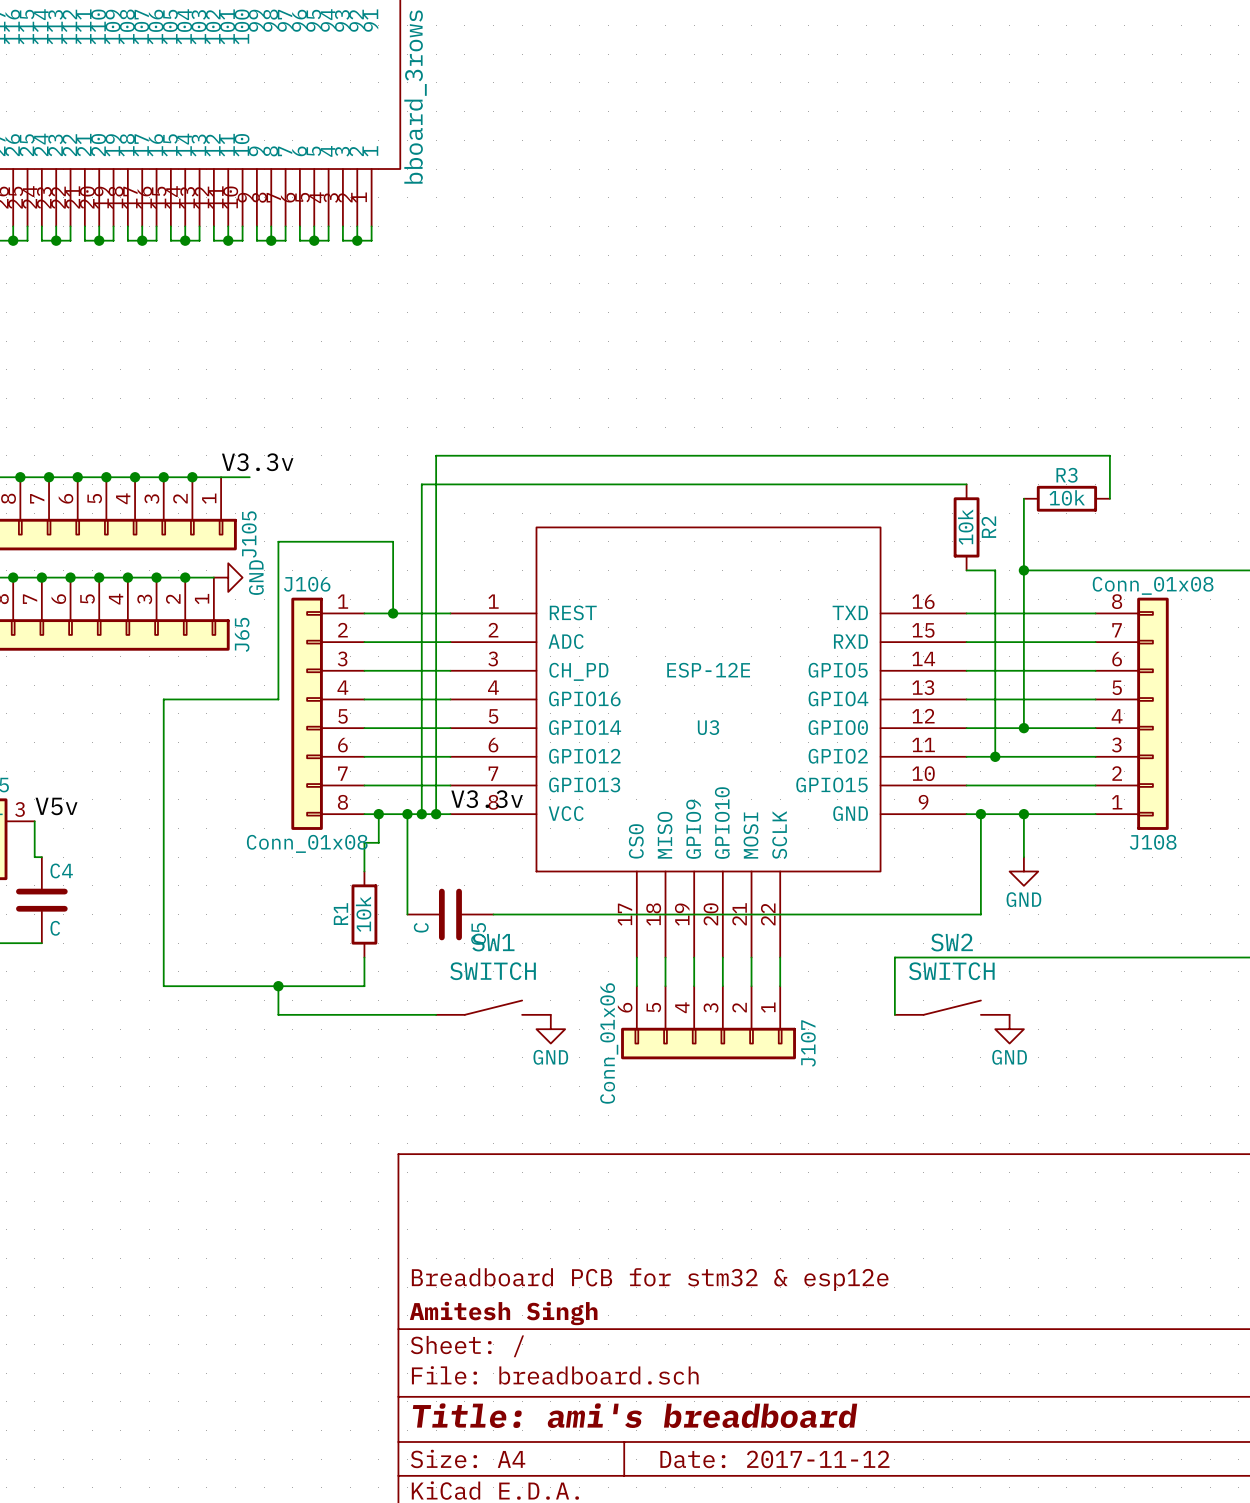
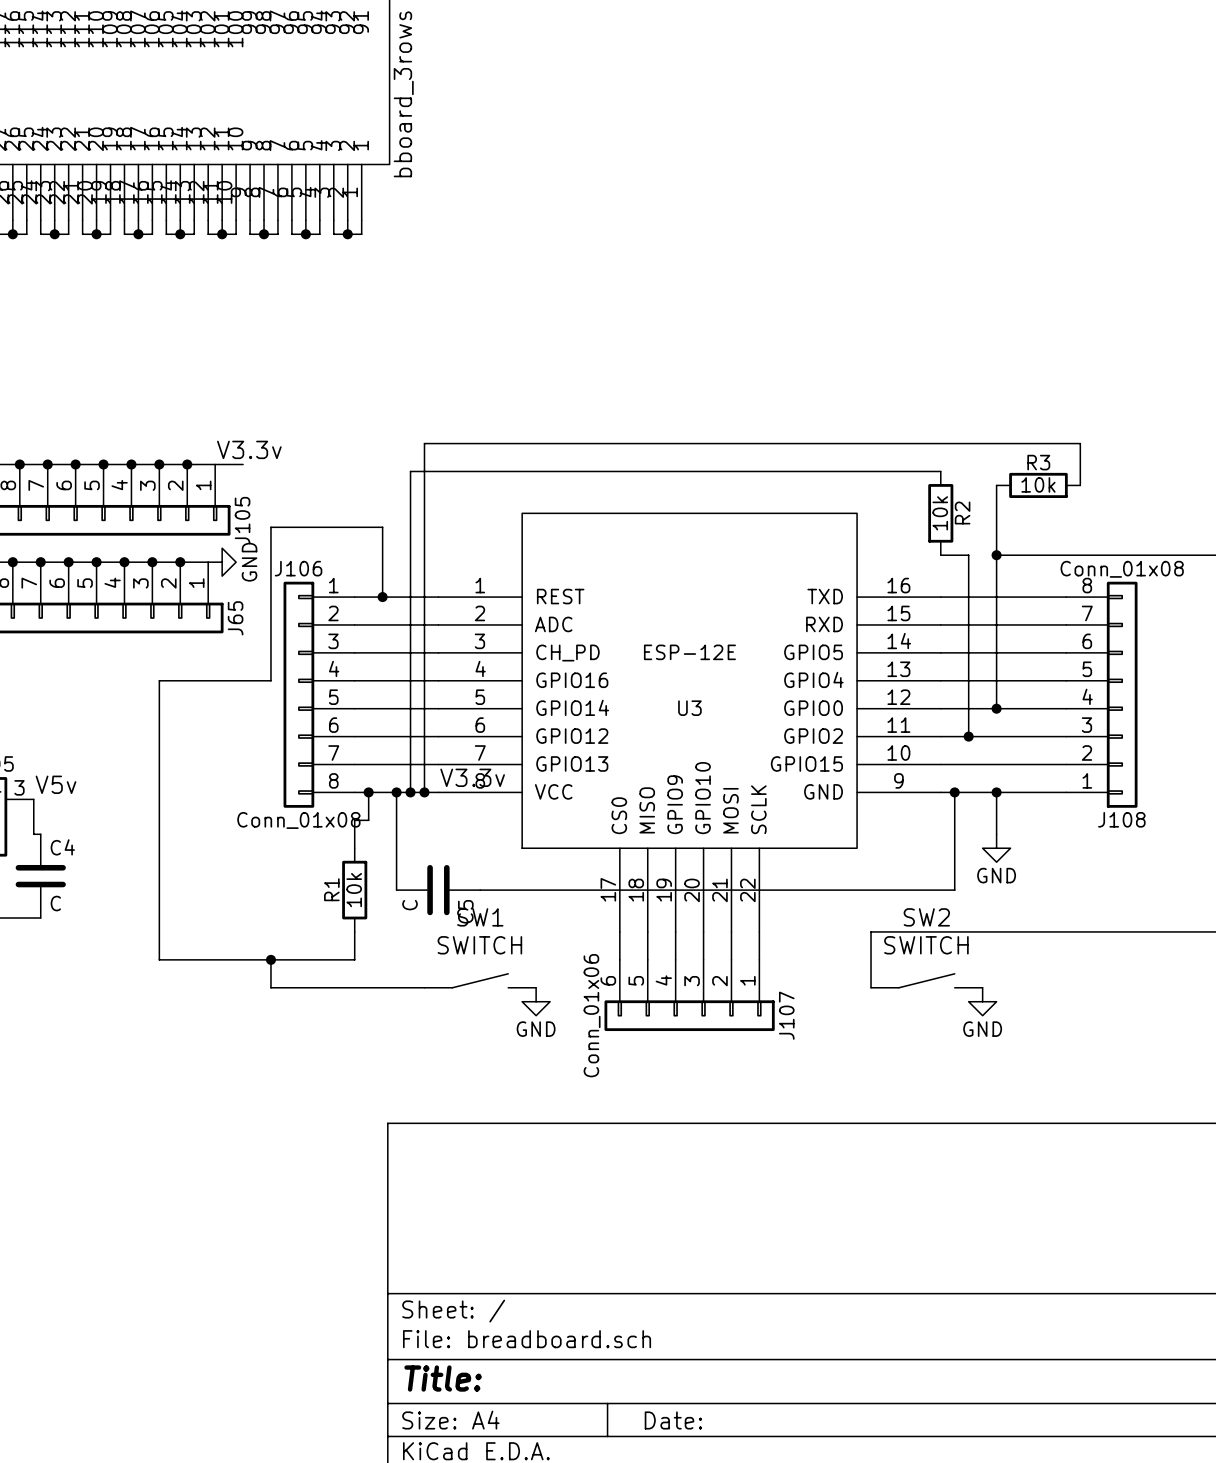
title block: Breadboard PCB for stm32 & esp12e (650, 1279) -> none
title block: Amitesh Singh (503, 1313) -> none
title block: Title: ami's breadboard (635, 1415) -> Title: (443, 1378)
title block: Date: 2017-11-12 (774, 1459) -> Date: (673, 1420)

